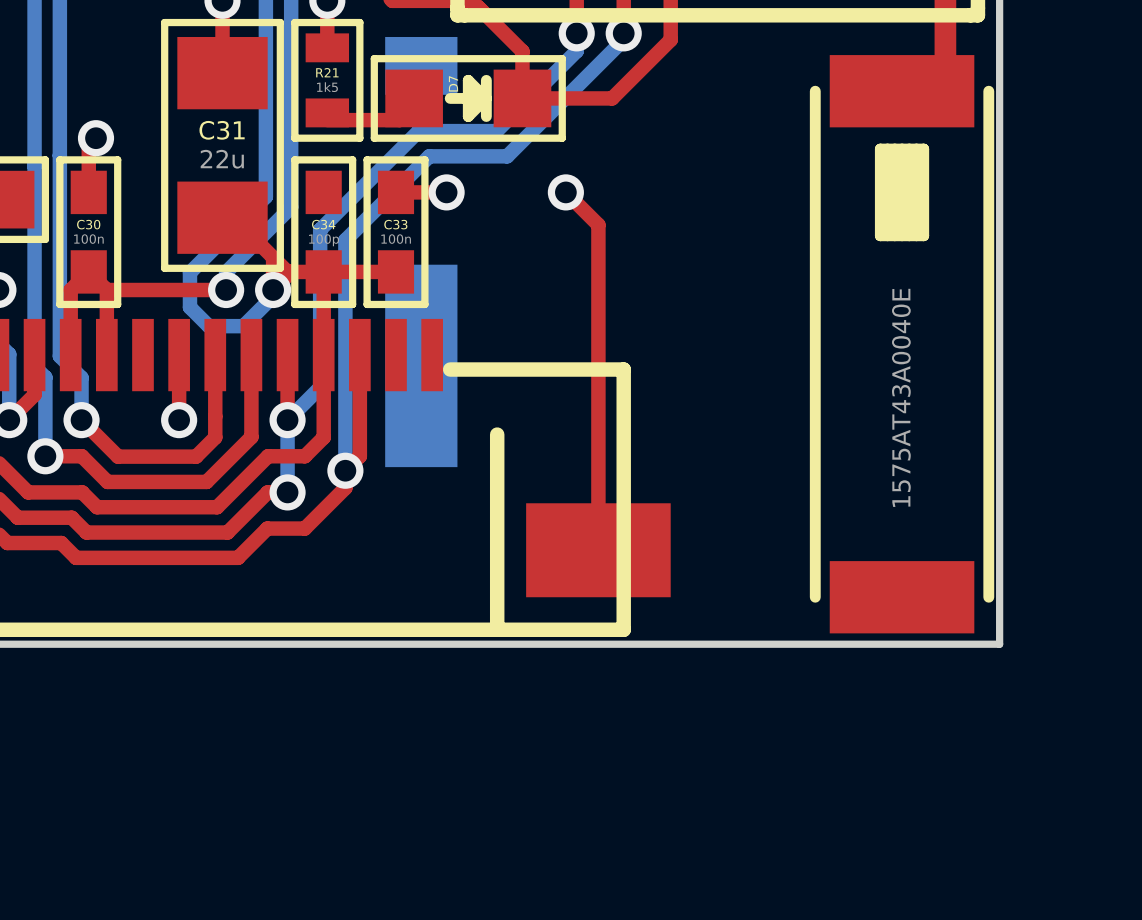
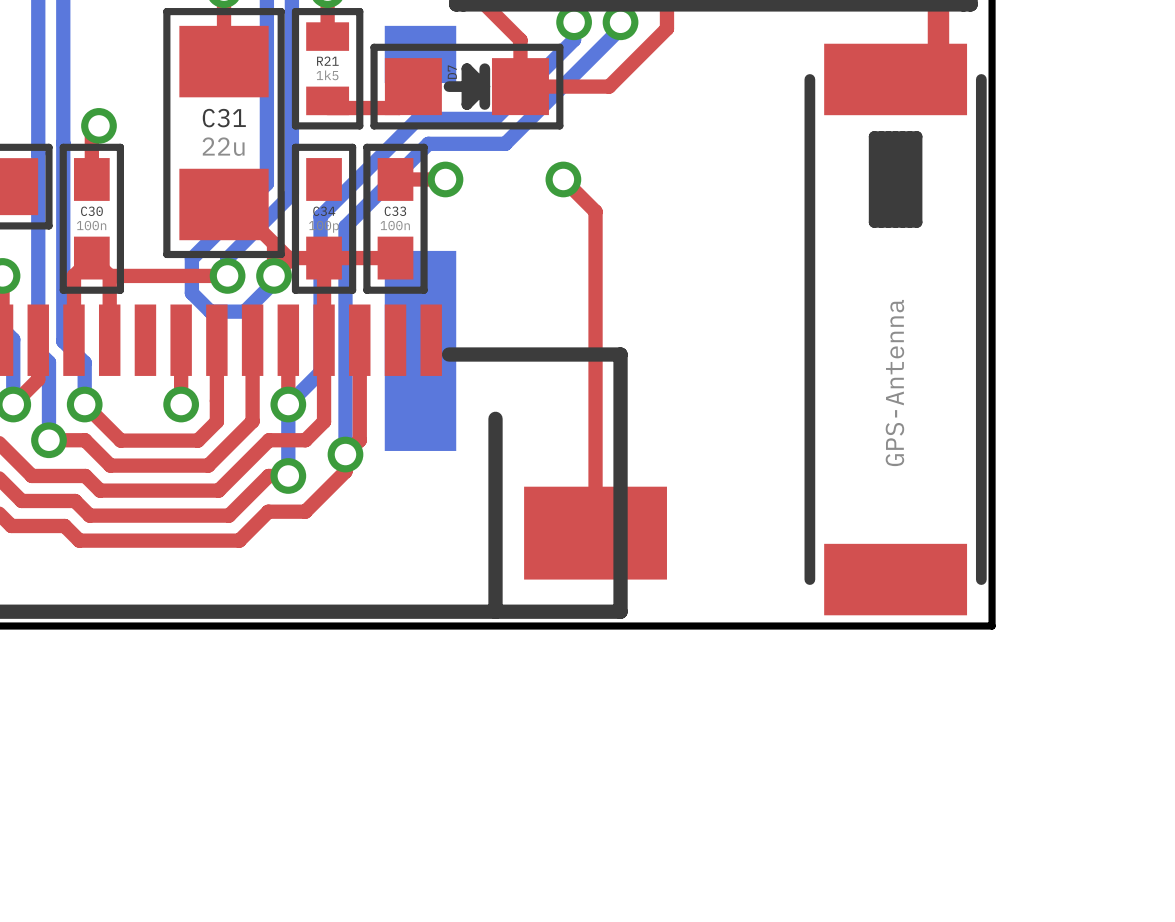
part value: 1575AT43A0040E (901, 397) -> GPS-Antenna (894, 383)

